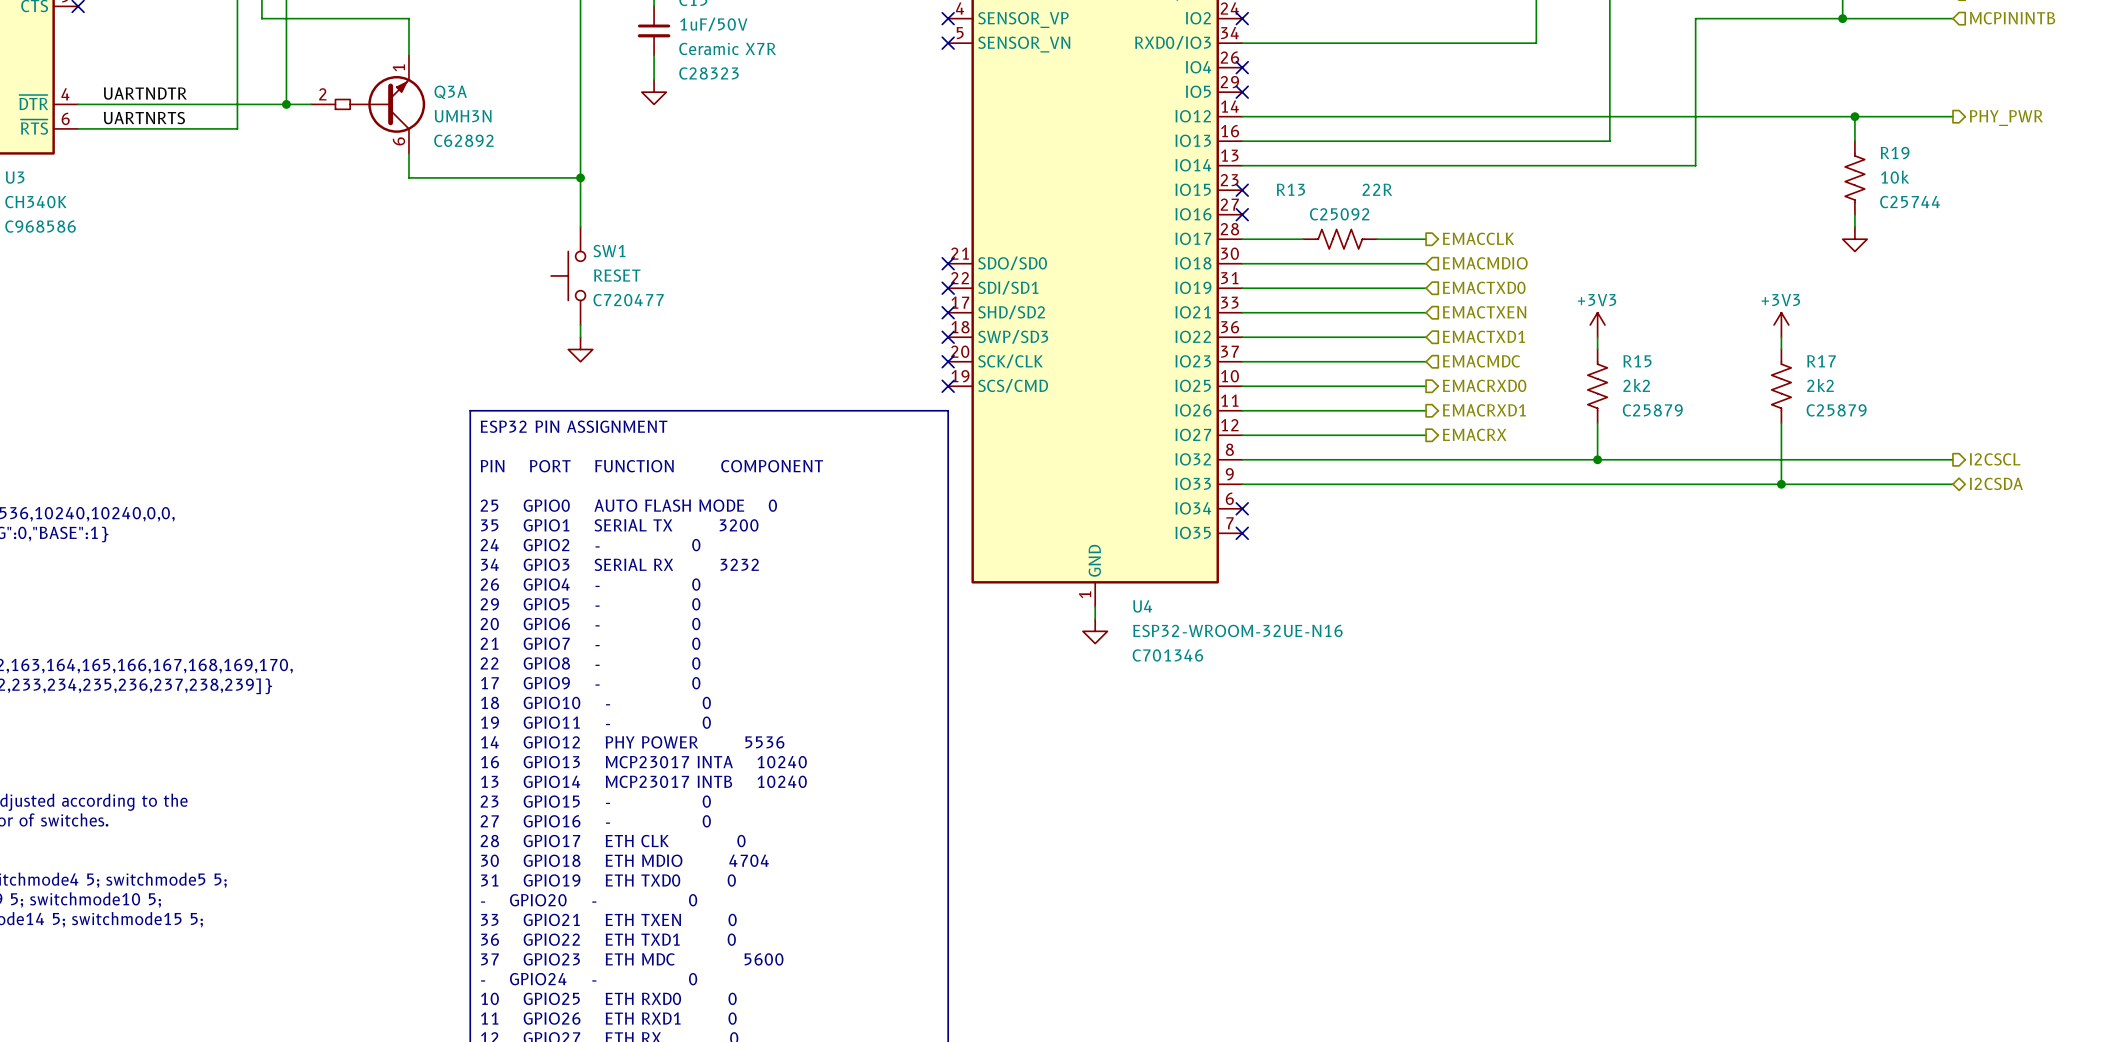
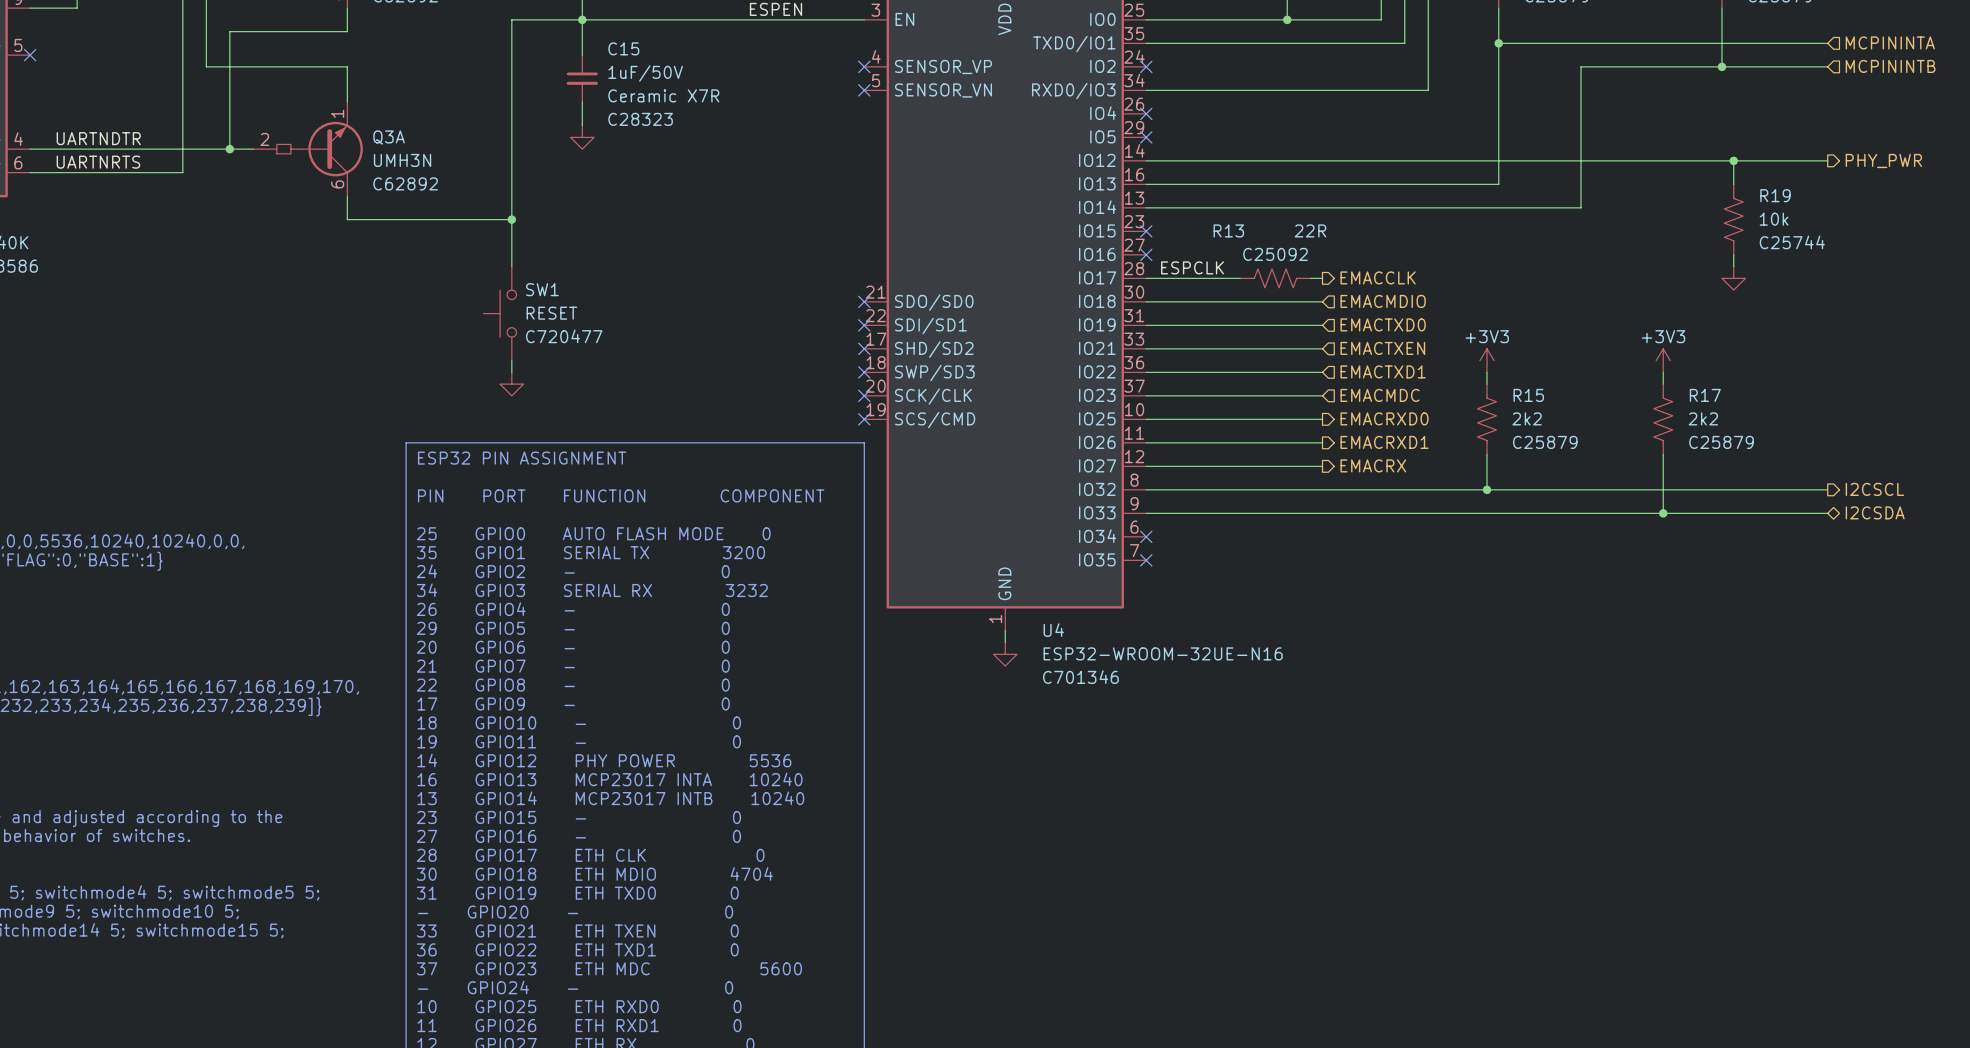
label: none -> ESPCLK (1192, 267)
R13 position: (1340, 239) -> (1275, 278)

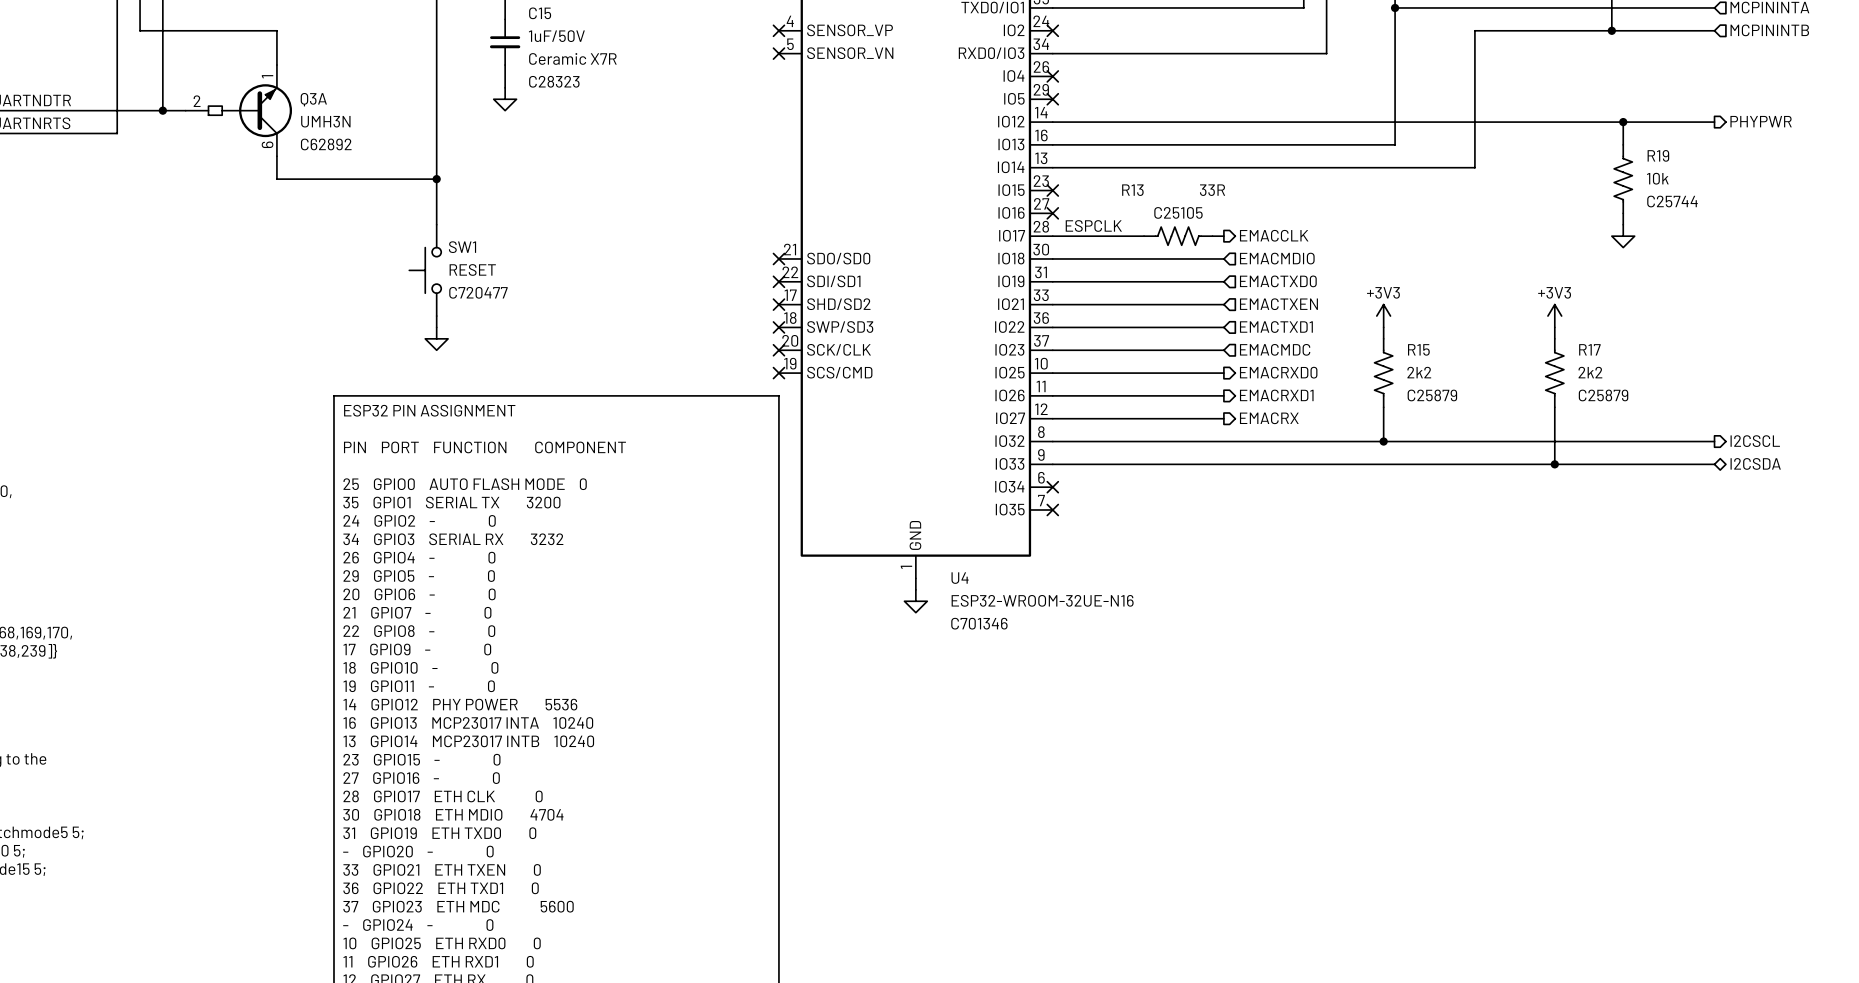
hierarchical label: PHY_PWR (1883, 160) -> PHYPWR (1761, 121)
R13 value: 22R (1310, 230) -> 33R (1212, 190)
R13 text: C25092 (1275, 254) -> C25105 (1178, 212)

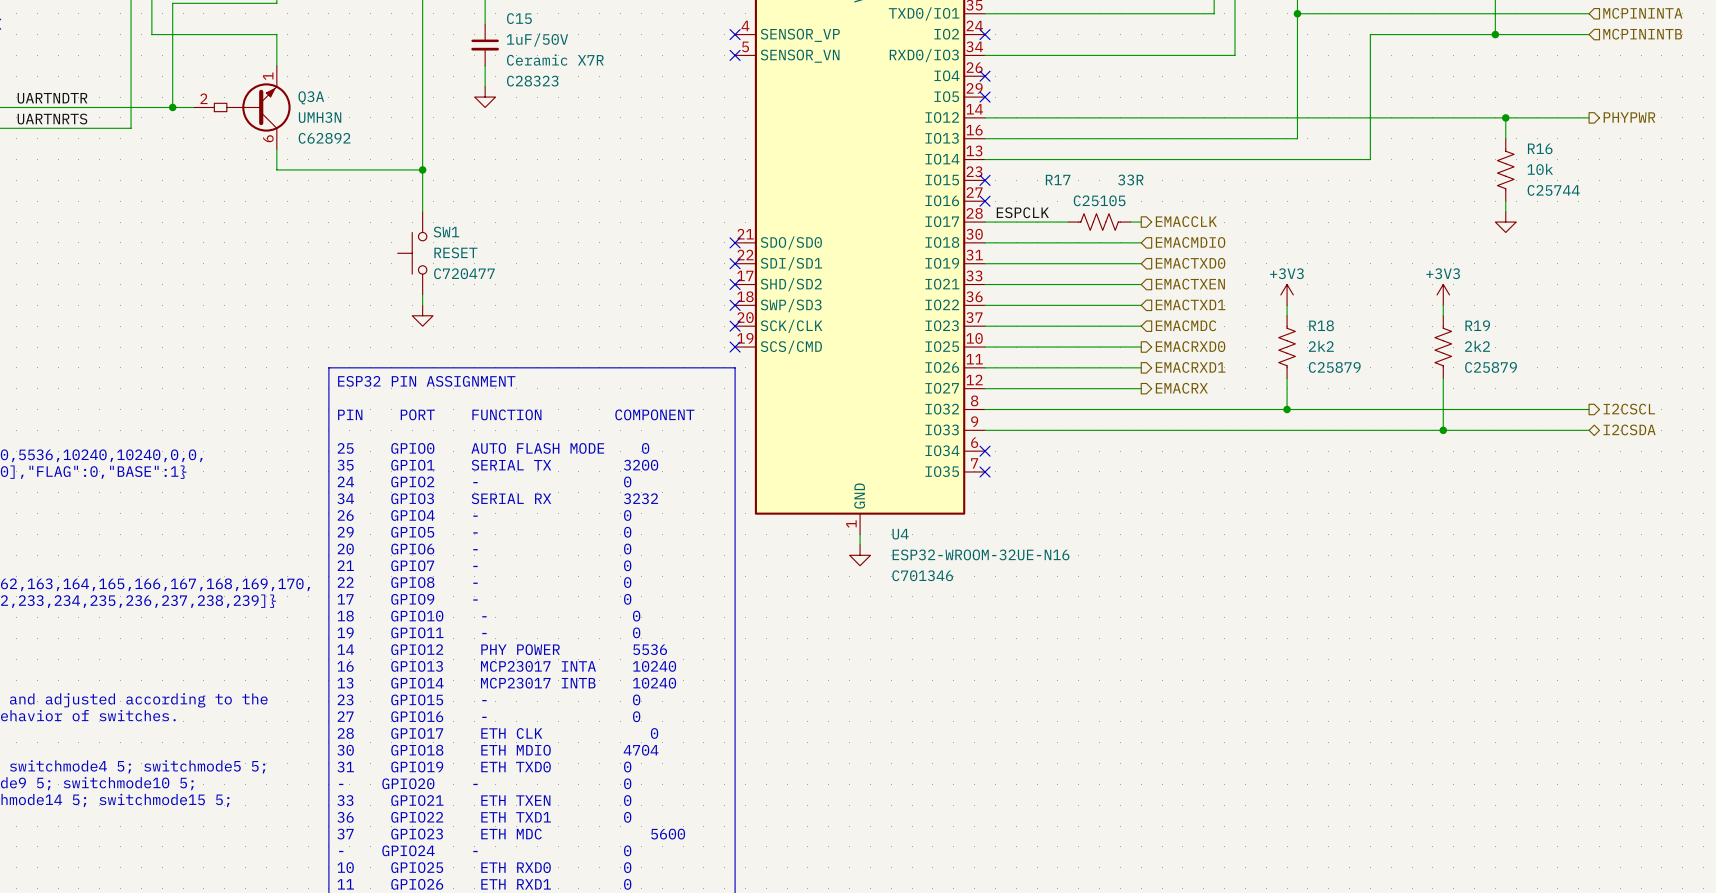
R19 name: R19 (1658, 155) -> R16 (1540, 148)
R13 name: R13 (1132, 190) -> R17 (1058, 179)
R15 name: R15 (1418, 349) -> R18 (1321, 325)
R17 name: R17 (1589, 349) -> R19 (1477, 325)

